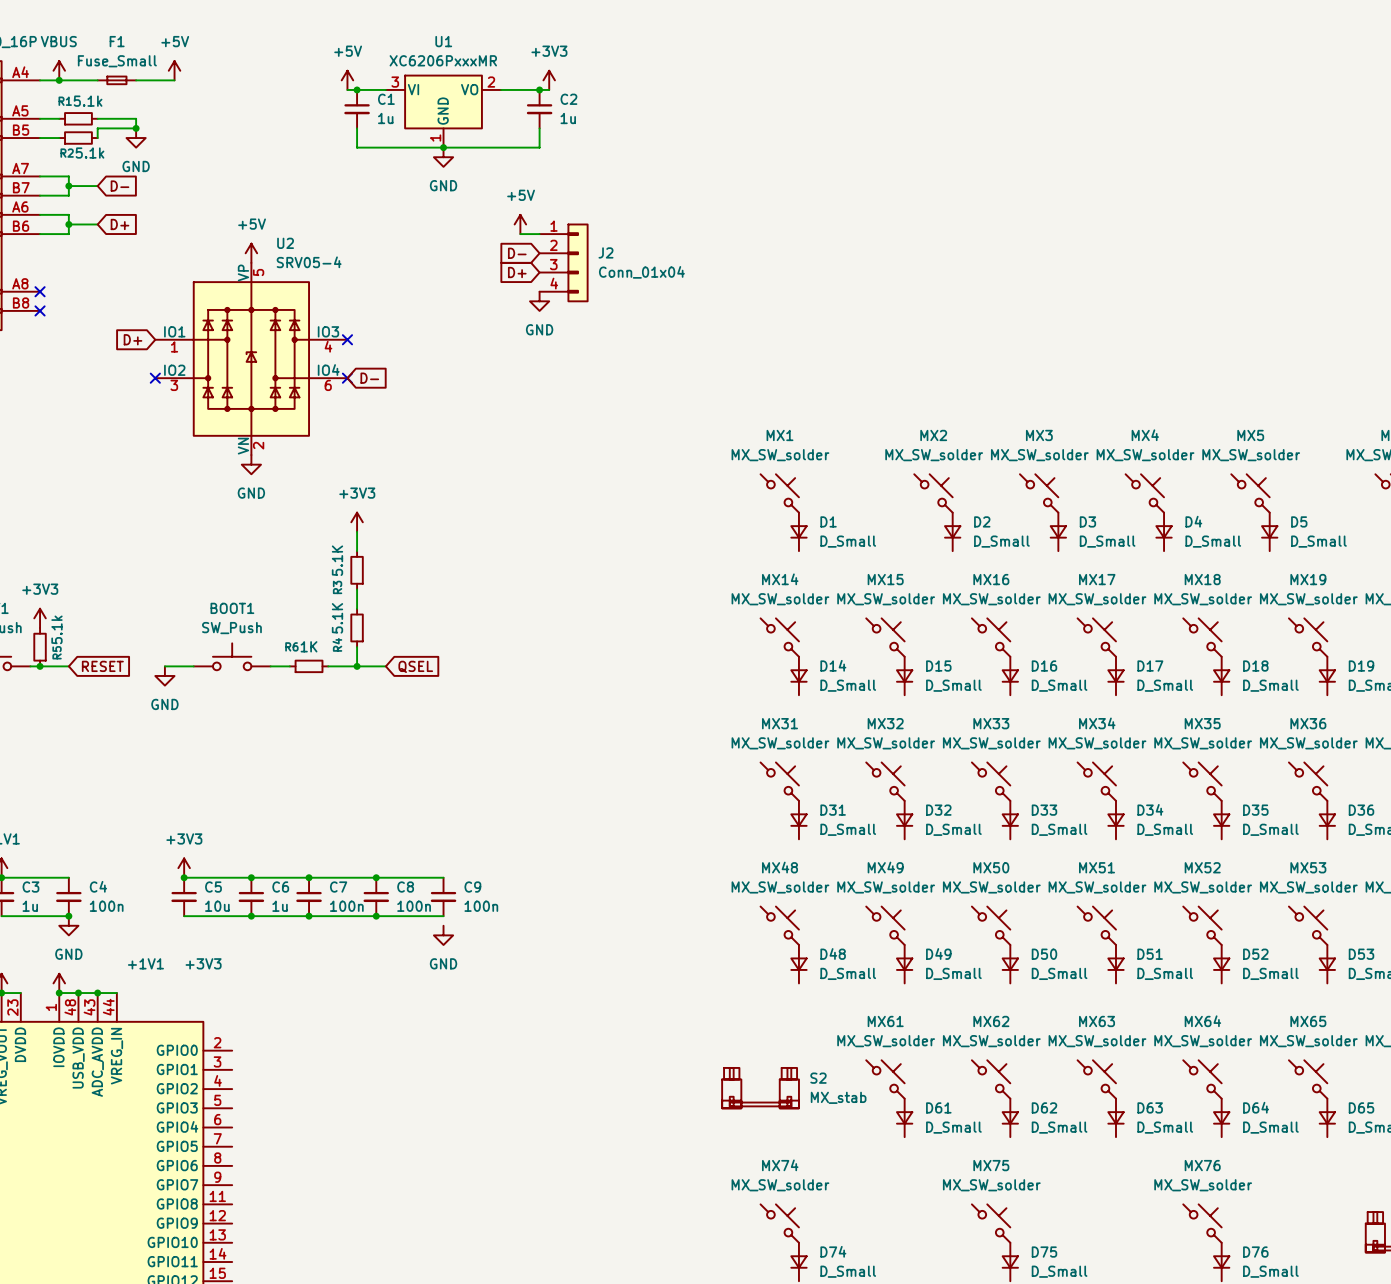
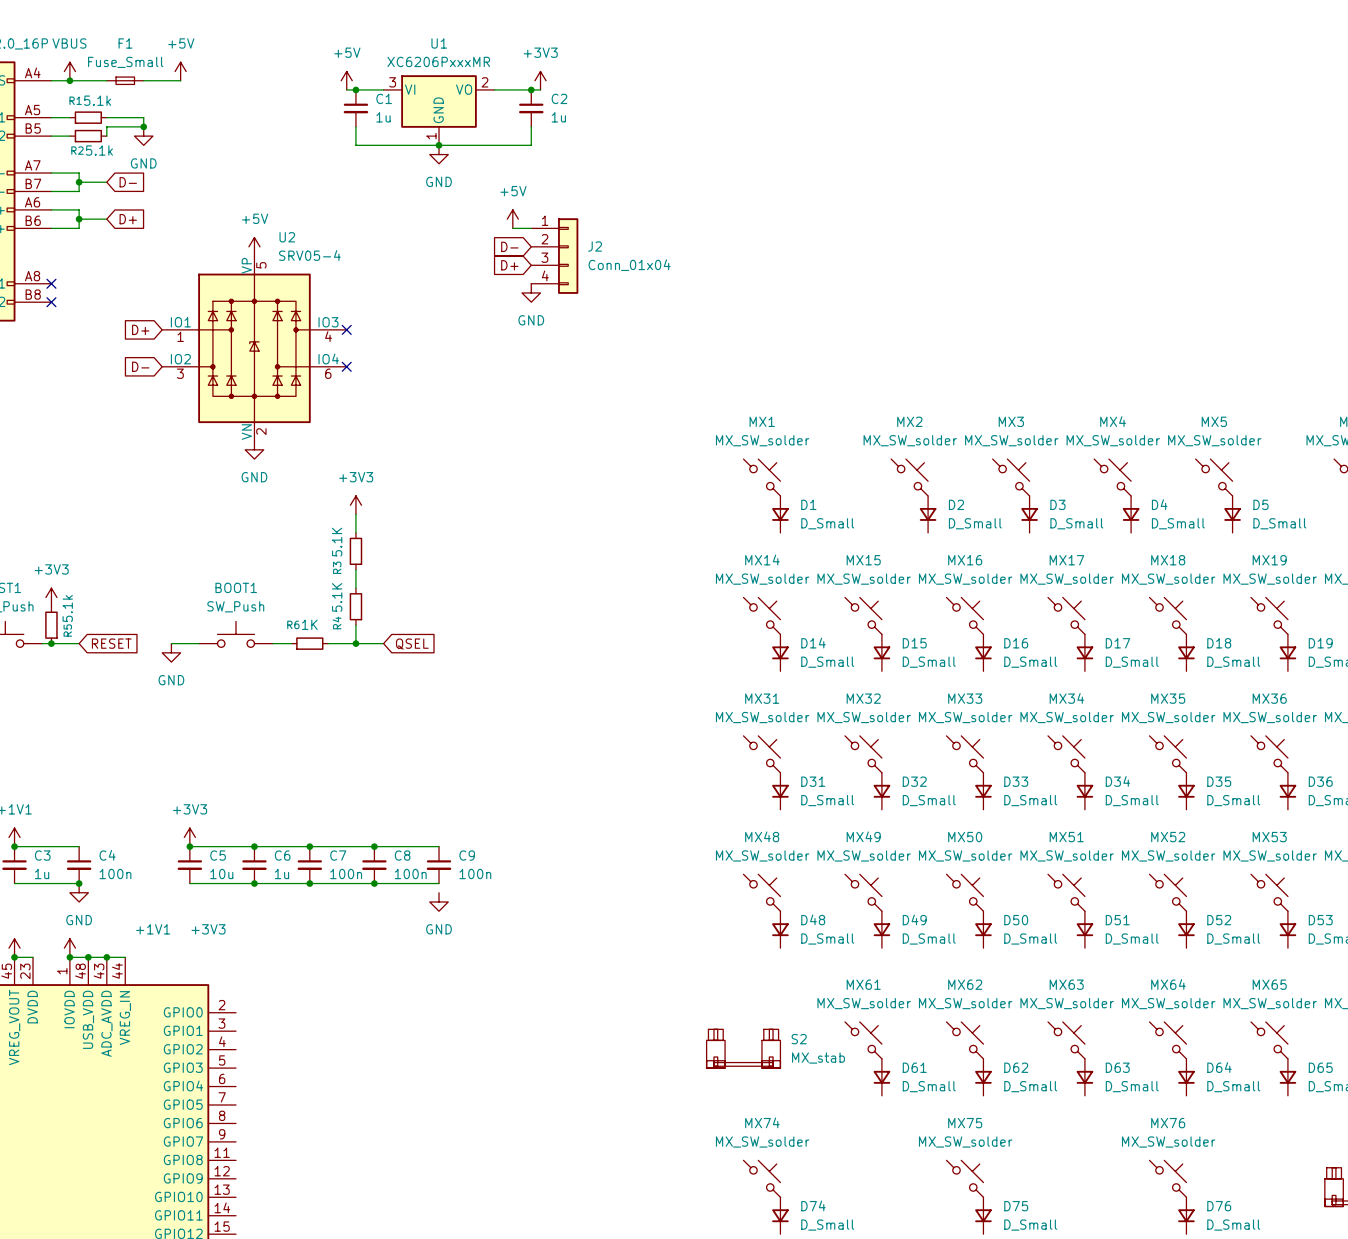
global label: none -> D- (140, 366)
no-connect mark: (155, 378) -> none
global label: D- (369, 378) -> none

